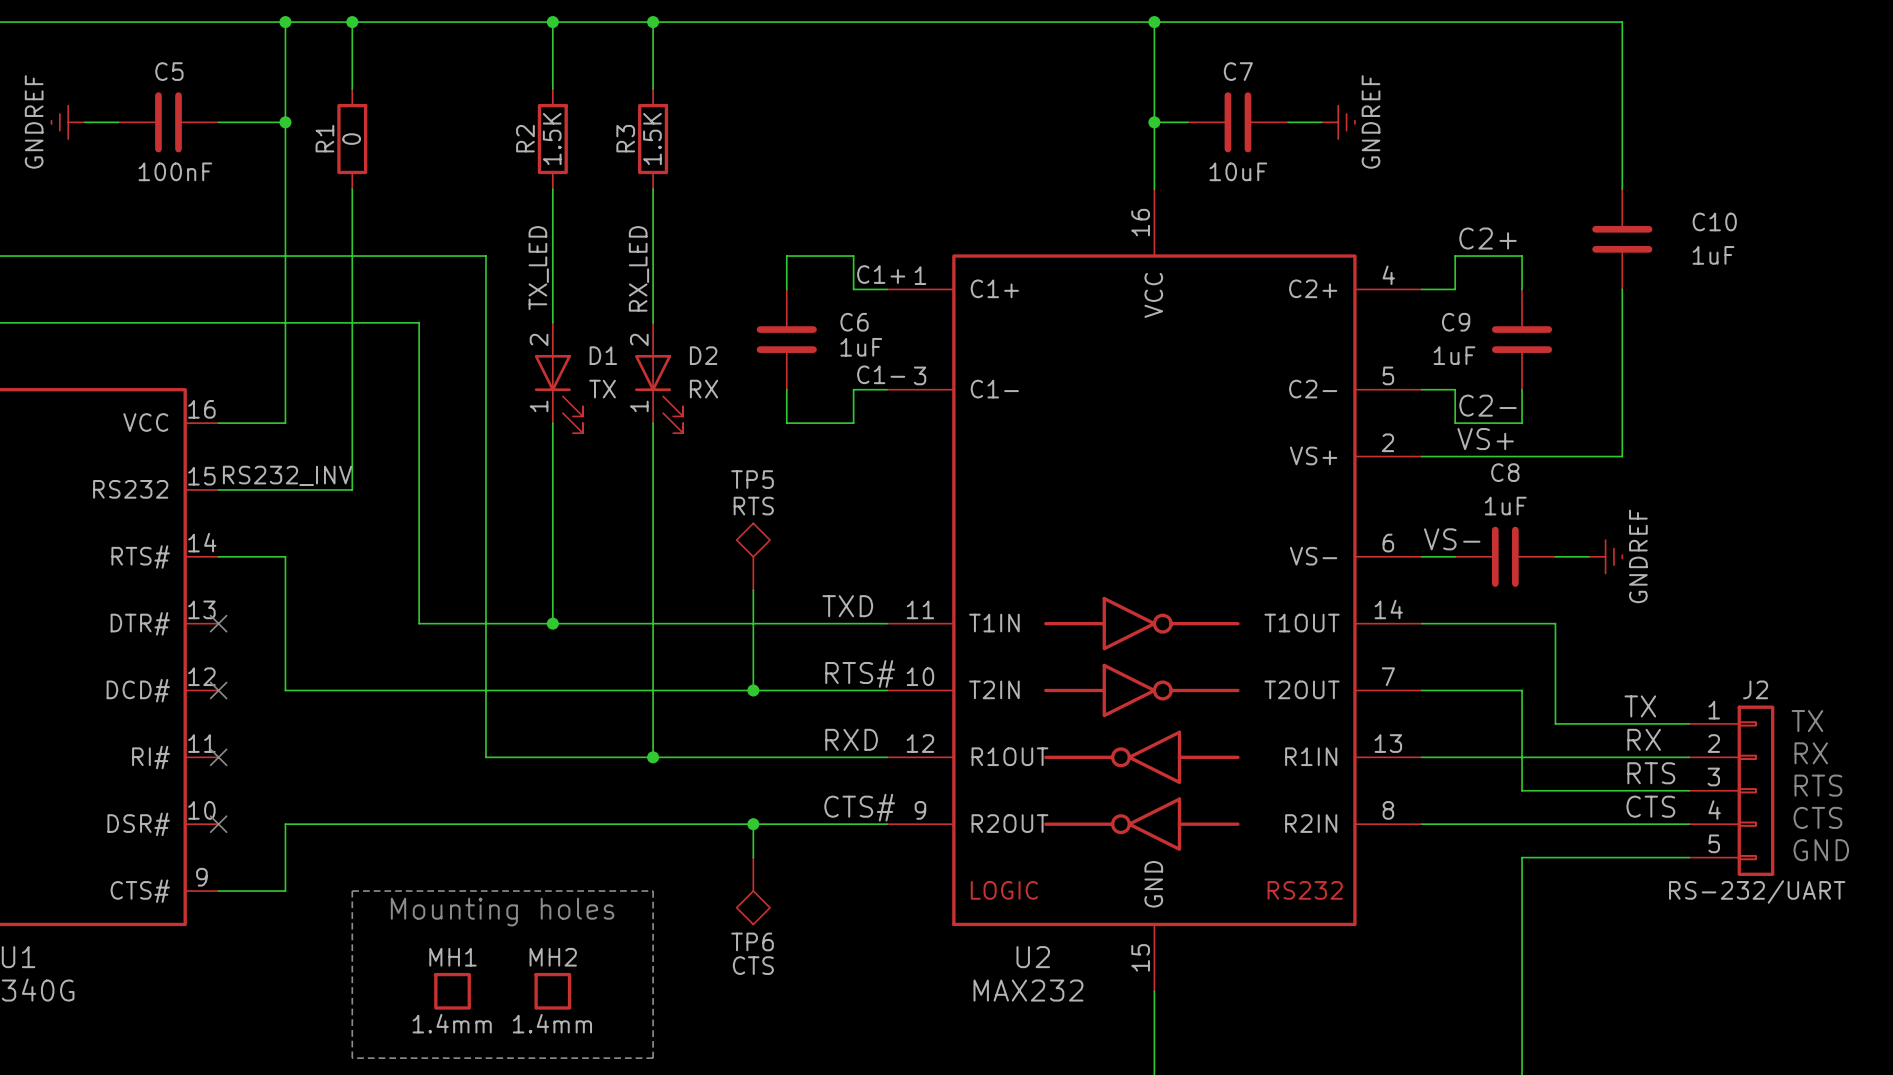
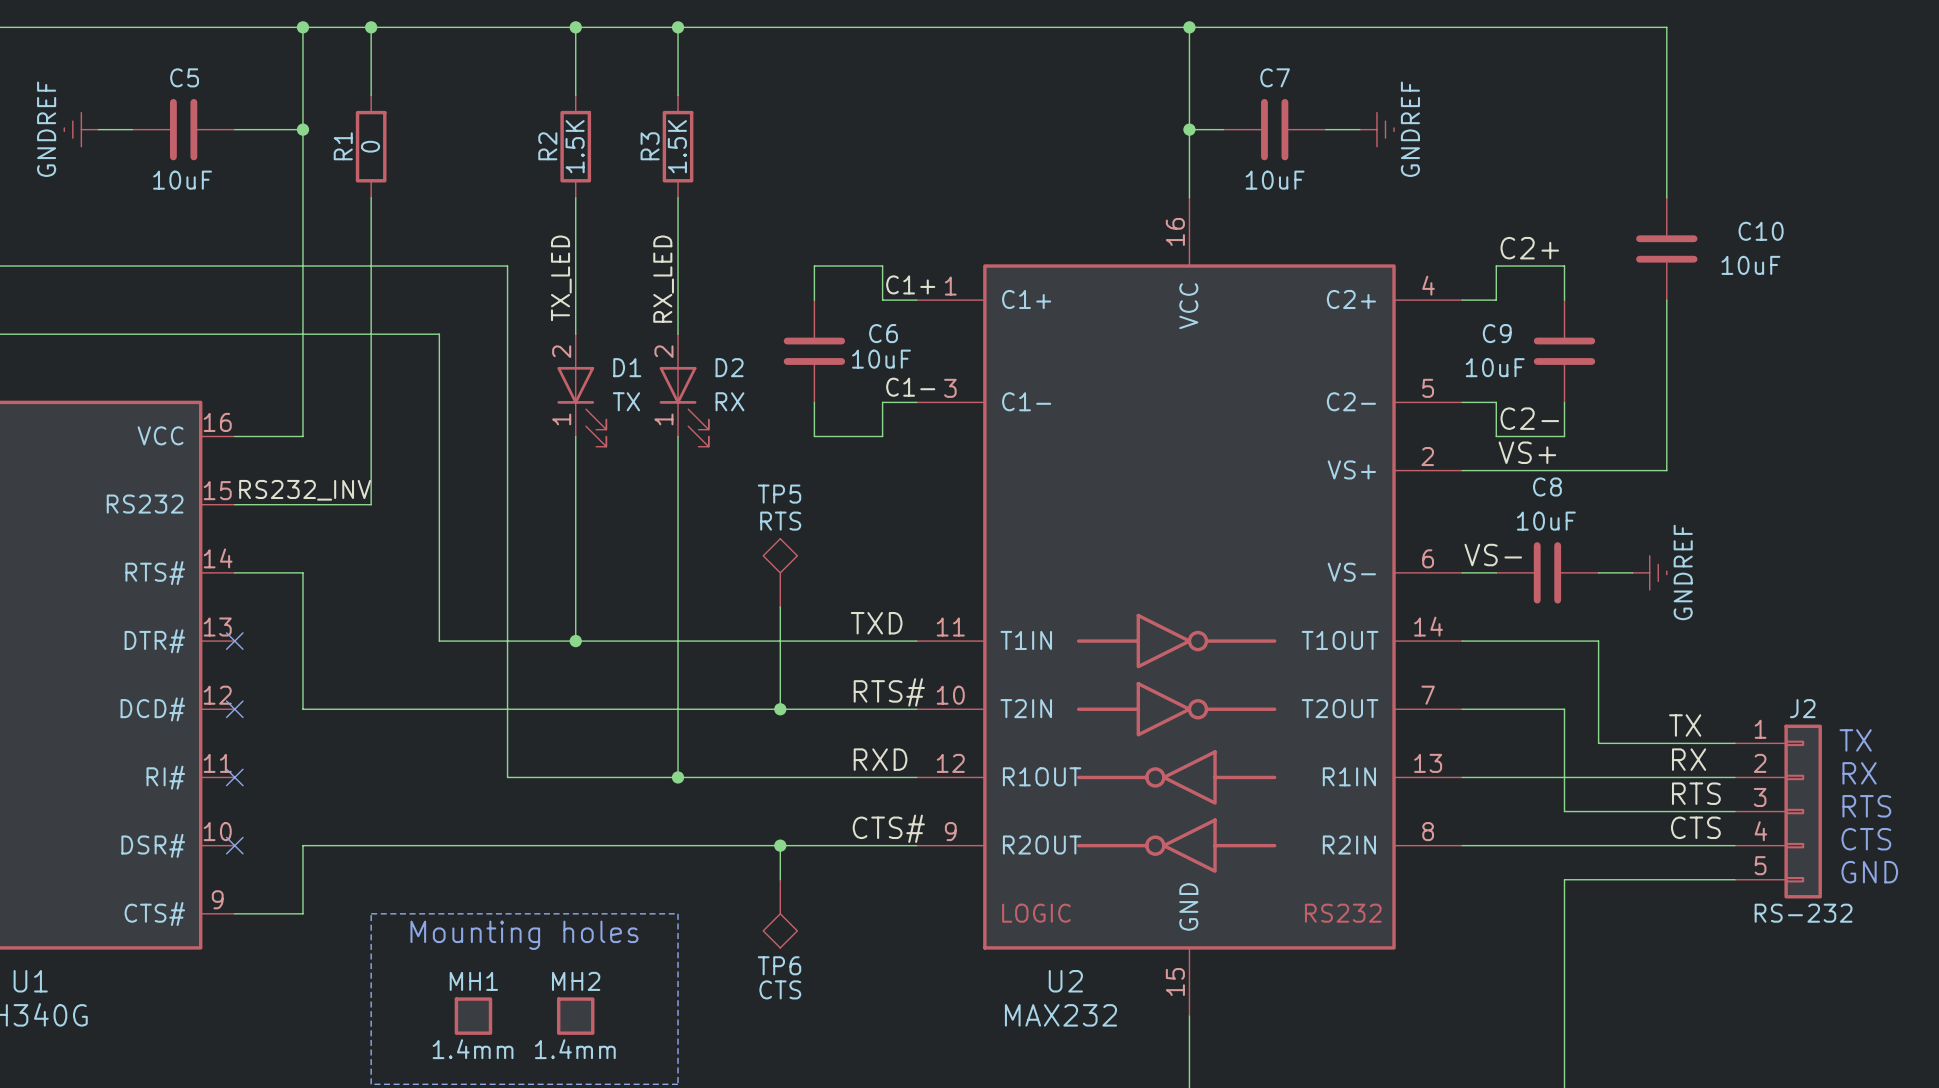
C5 value: 100nF (175, 171) -> 10uF (182, 180)
C10 value: 1uF (1713, 255) -> 10uF (1750, 265)
C6 value: 1uF (861, 347) -> 10uF (881, 359)
C9 value: 1uF (1454, 355) -> 10uF (1495, 367)
C8 value: 1uF (1505, 506) -> 10uF (1546, 521)
J2 value: RS-232/UART (1757, 891) -> RS-232 (1803, 913)

